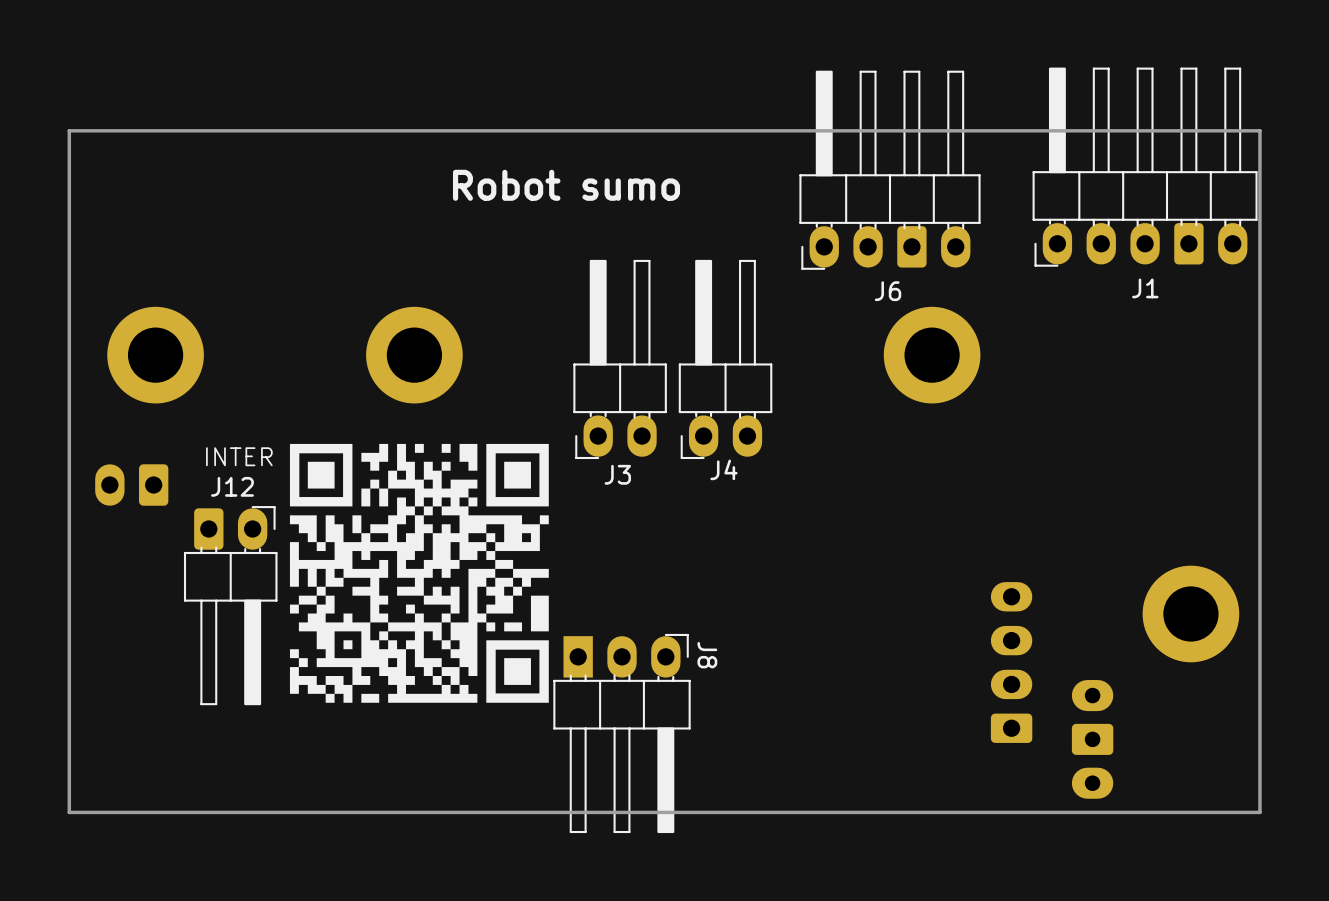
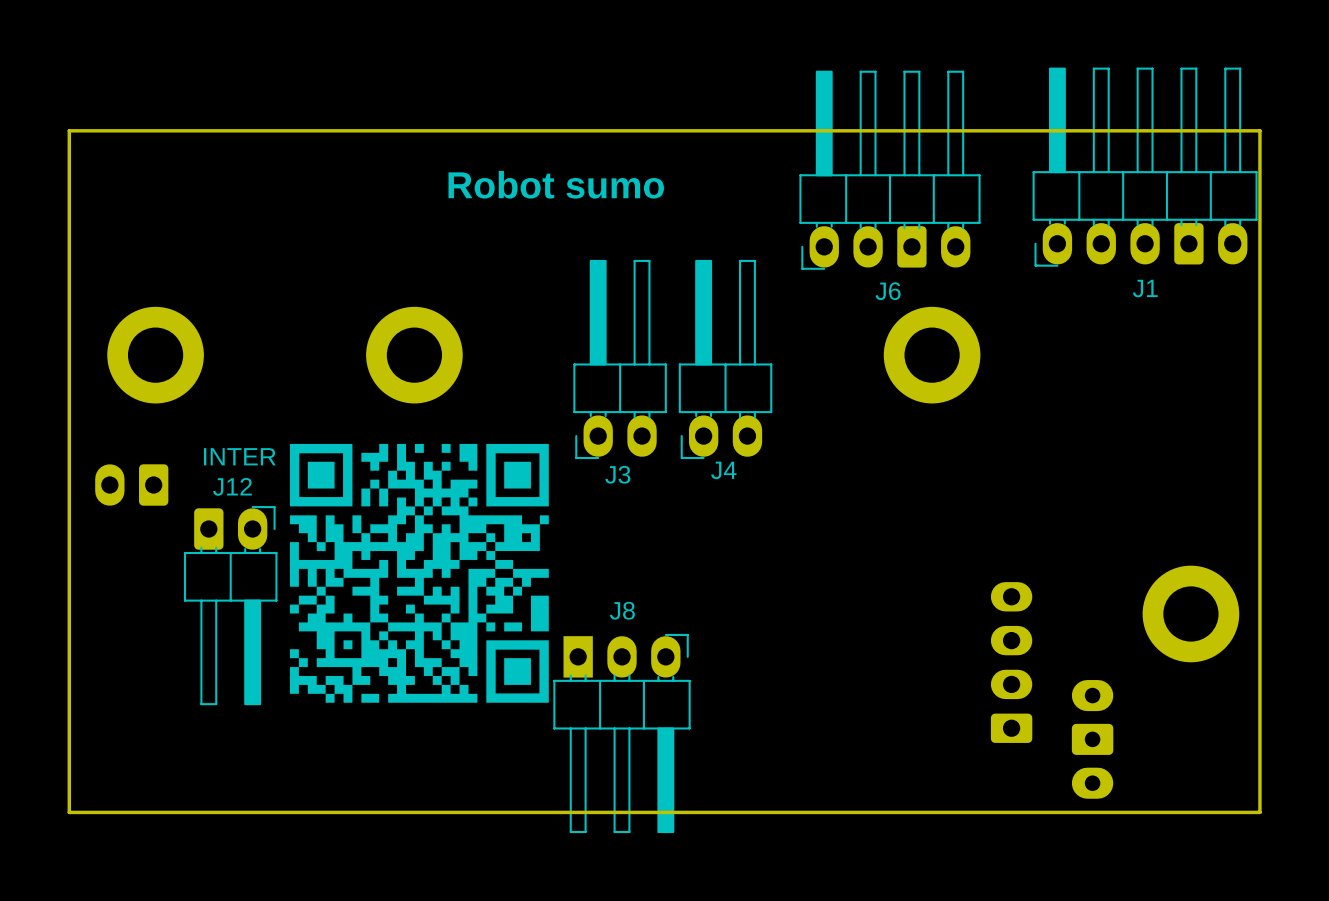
J8 name rotation: 0° (707, 655) -> 90° counterclockwise (622, 610)
J8 name position: J8 (707, 655) -> J8 (622, 610)

